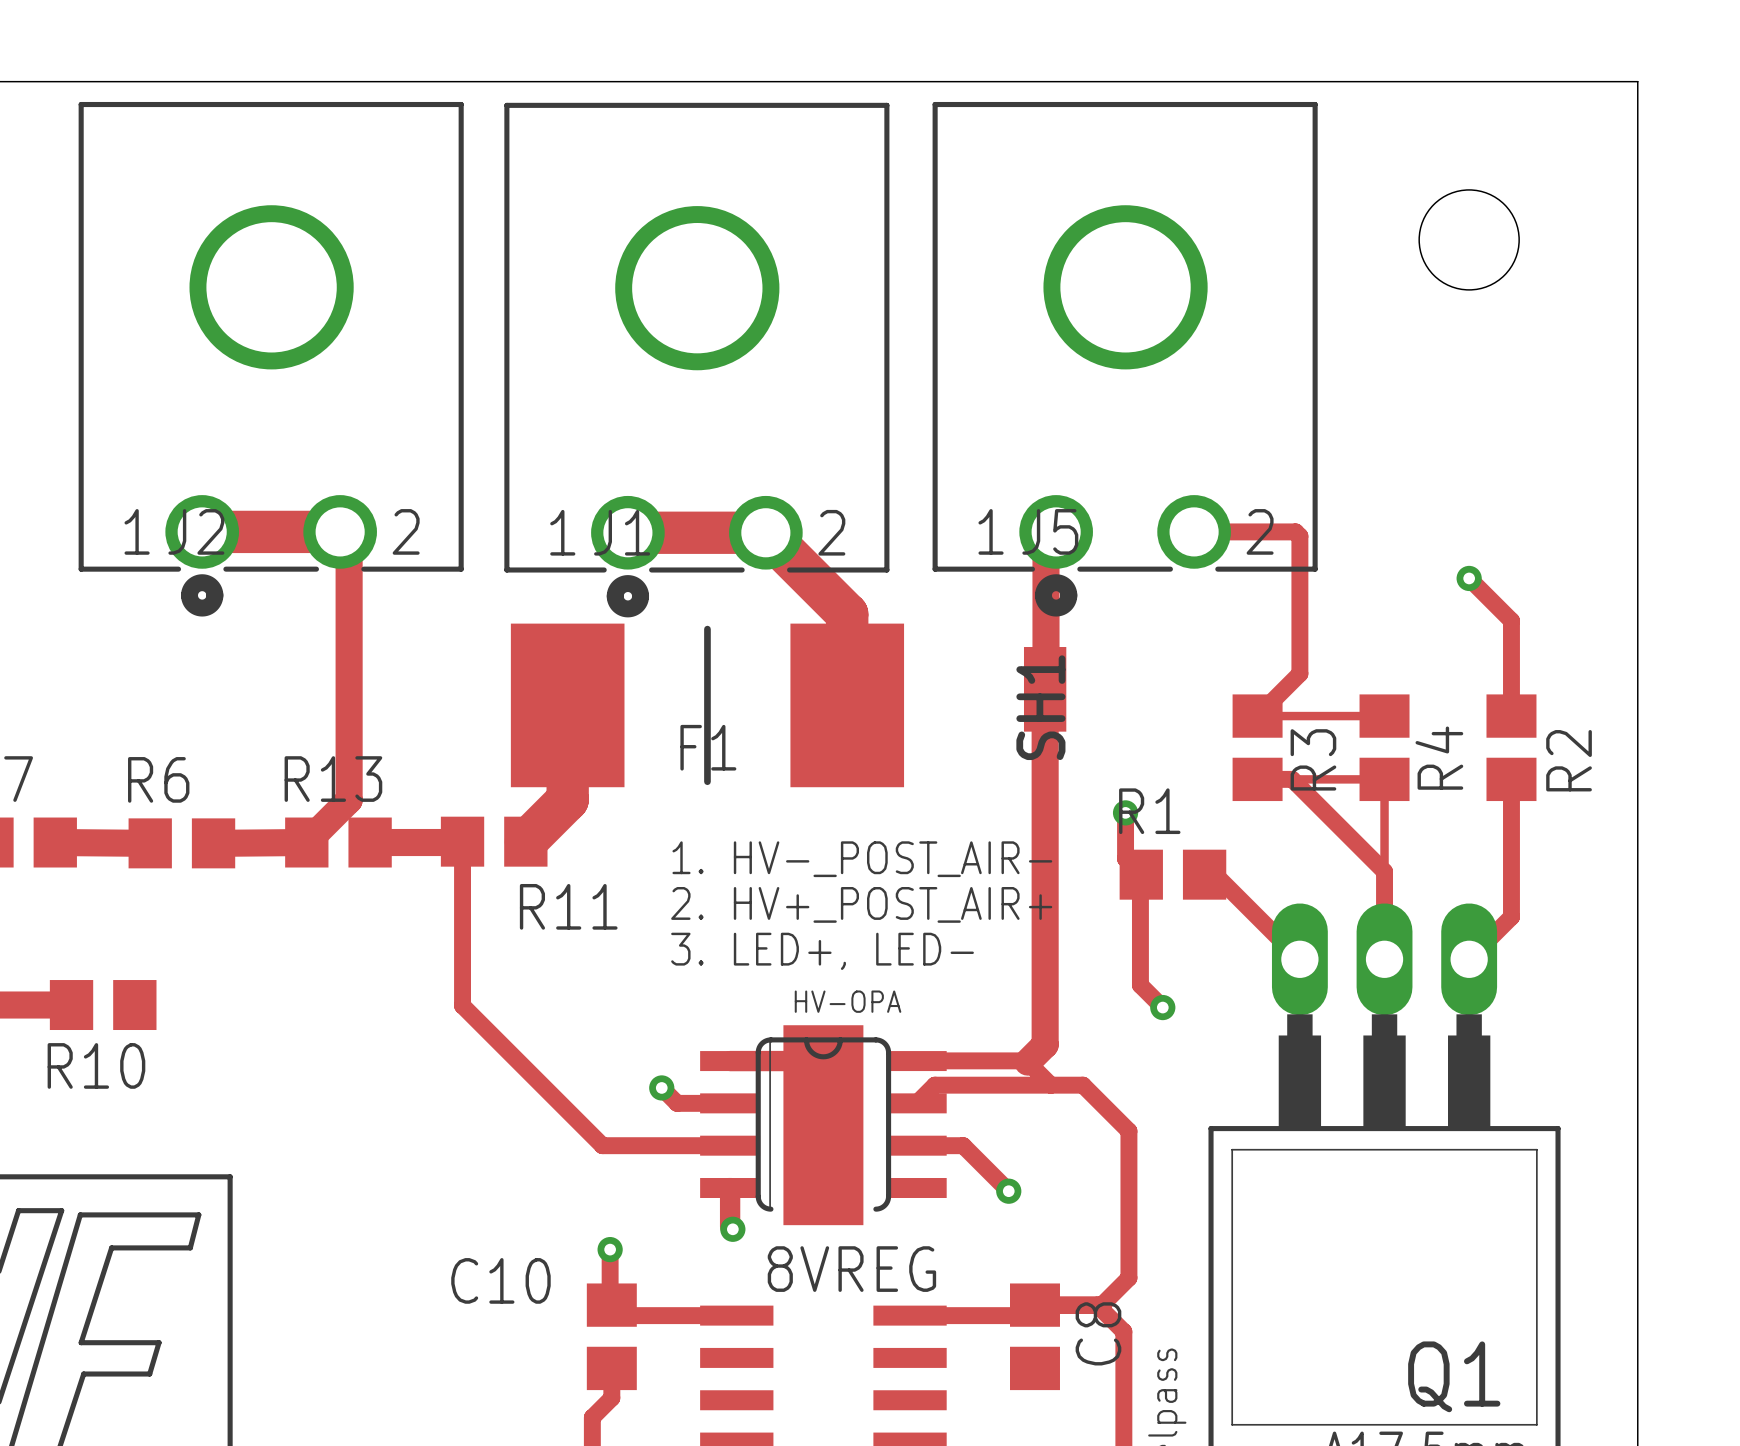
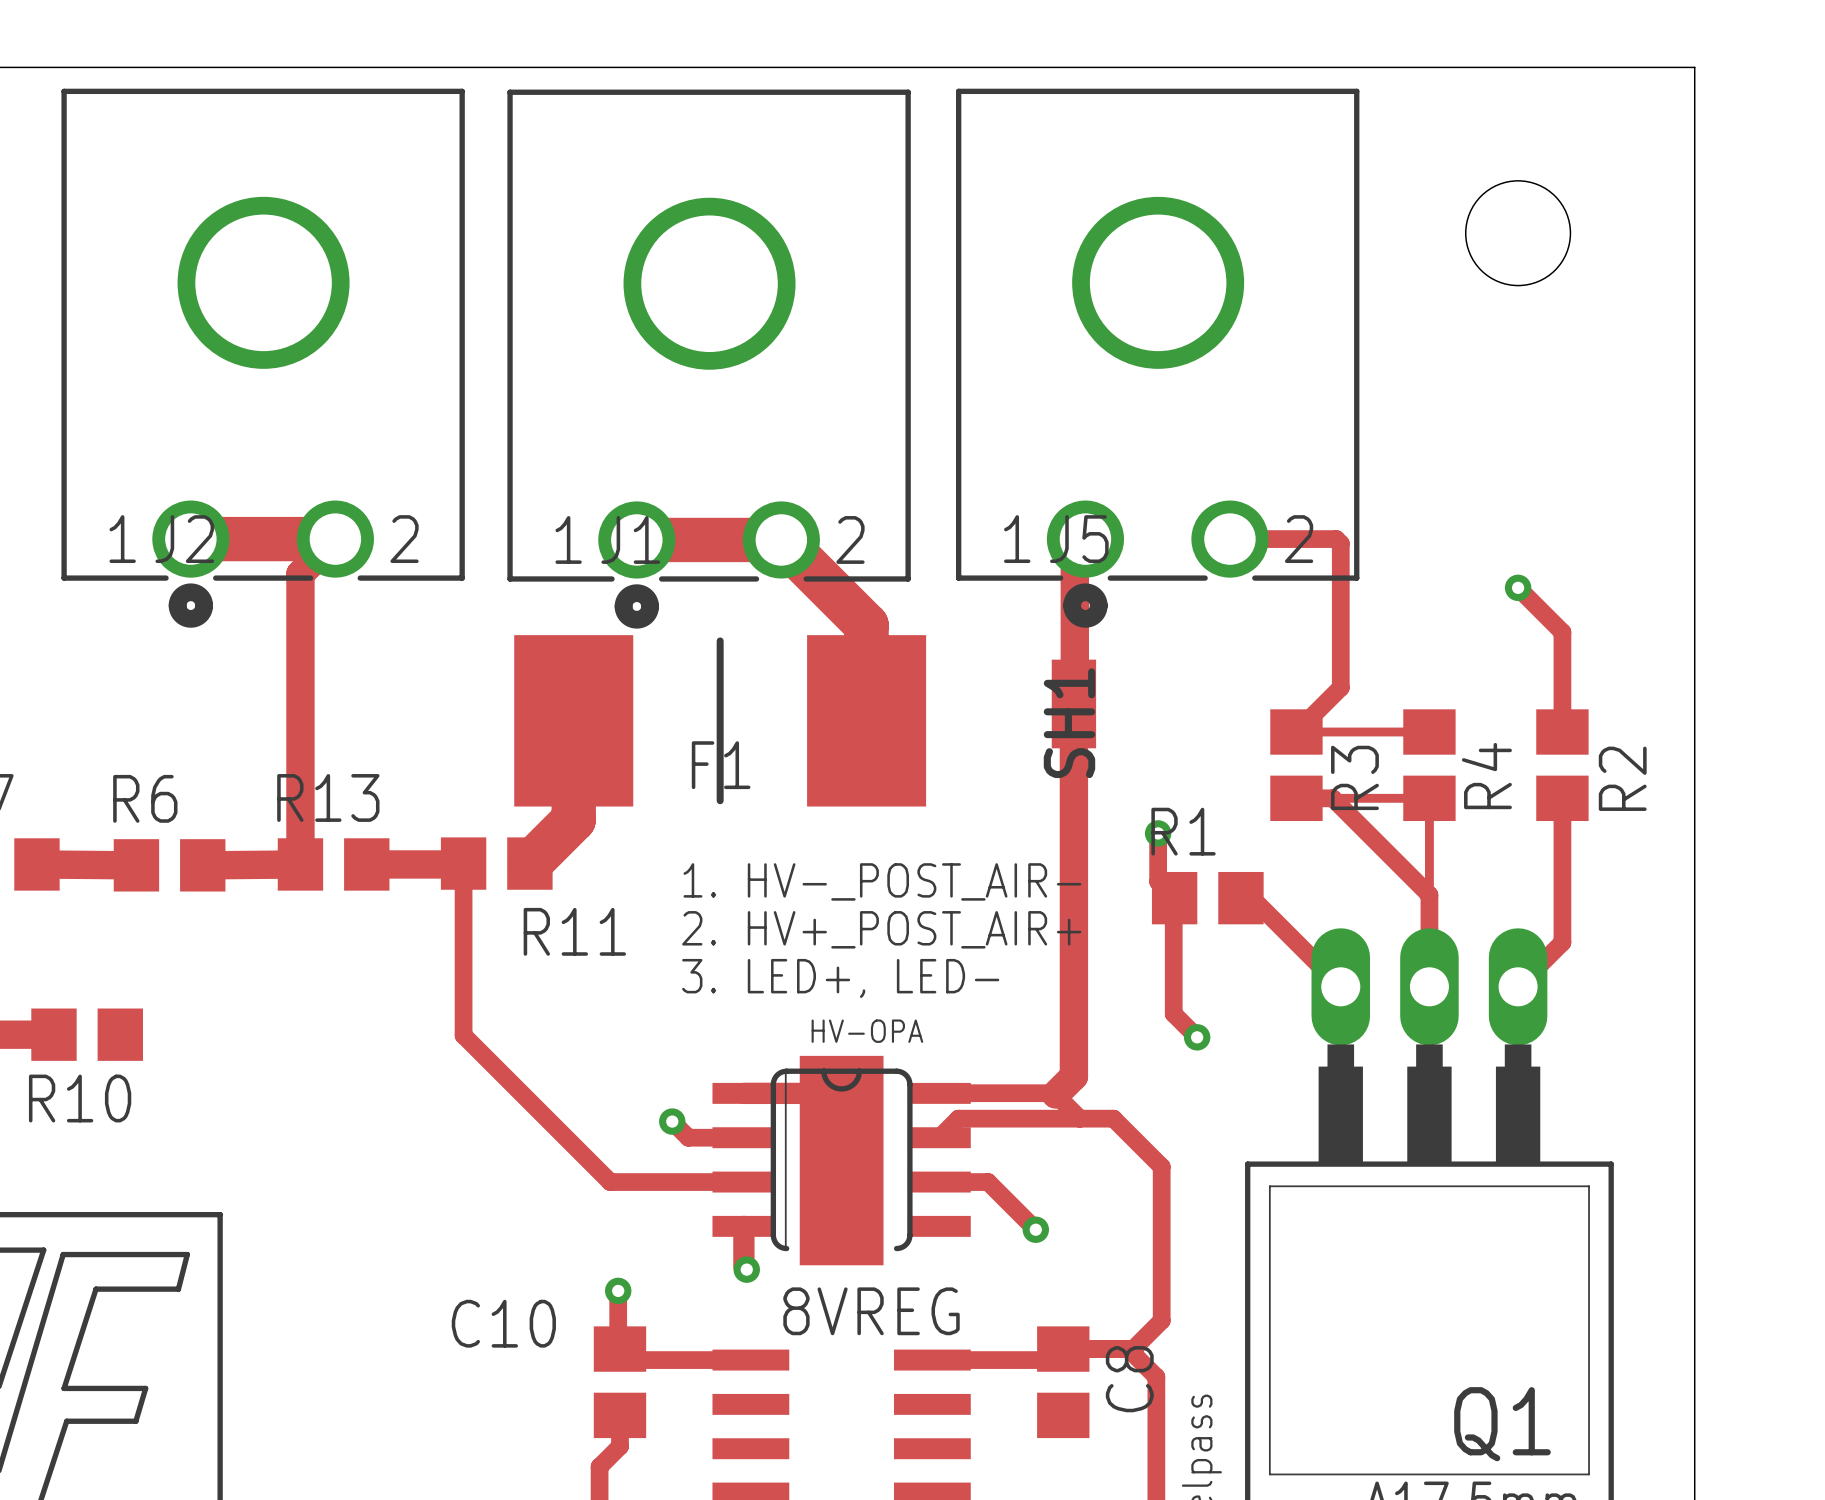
track: (340, 531) (349, 540) (349, 800) (306, 842) -> (335, 539) (300, 574) (300, 864)

